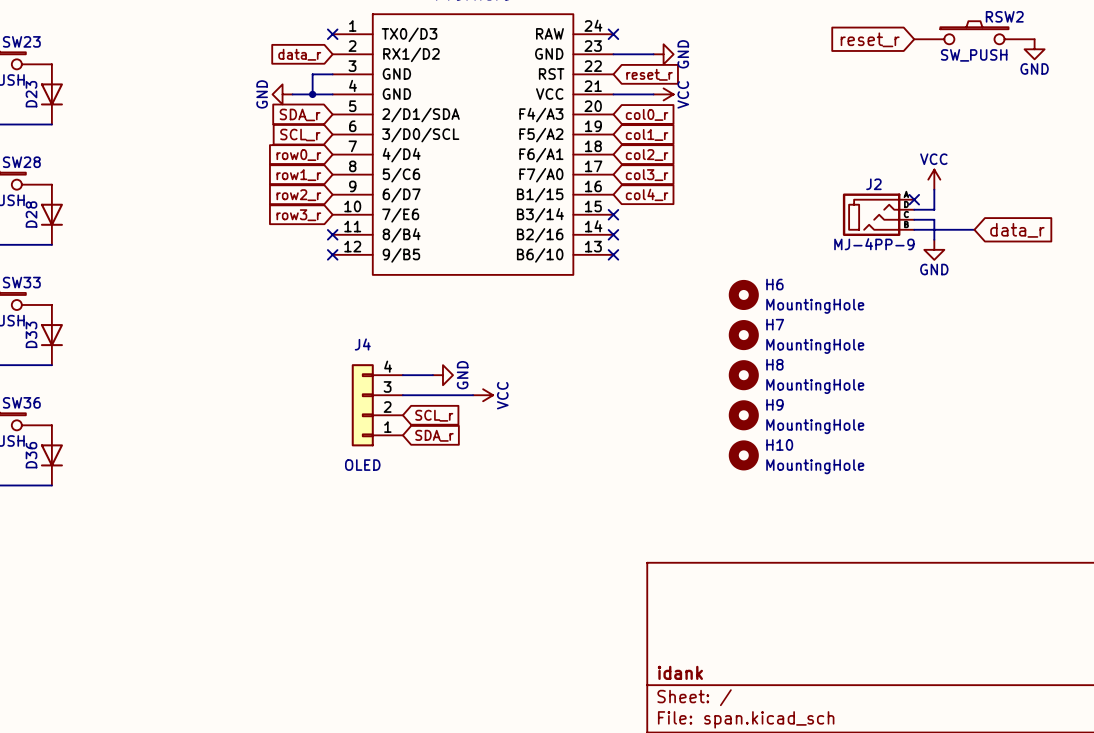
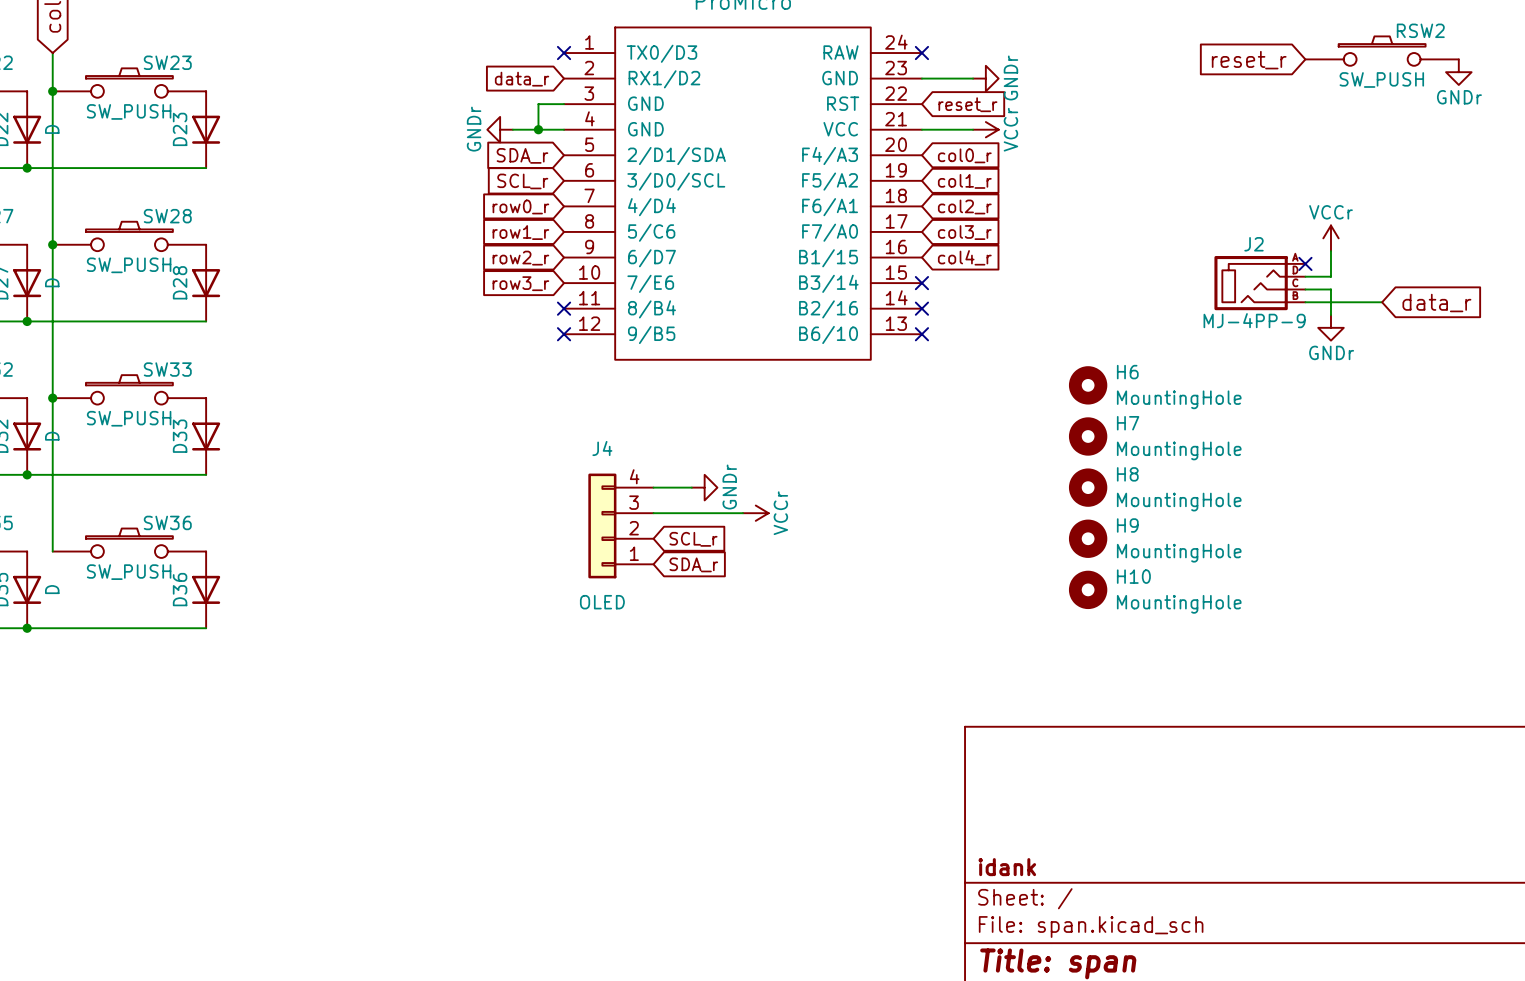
power symbol: GND (1034, 49) -> GNDr (1458, 72)
power symbol: GND (663, 54) -> GNDr (985, 78)
power symbol: GND (282, 94) -> GNDr (500, 129)
power symbol: VCC (663, 94) -> VCCr (985, 129)
power symbol: VCC (934, 179) -> VCCr (1330, 238)
power symbol: GND (934, 249) -> GNDr (1330, 327)
power symbol: GND (442, 375) -> GNDr (704, 487)
power symbol: VCC (483, 395) -> VCCr (755, 513)

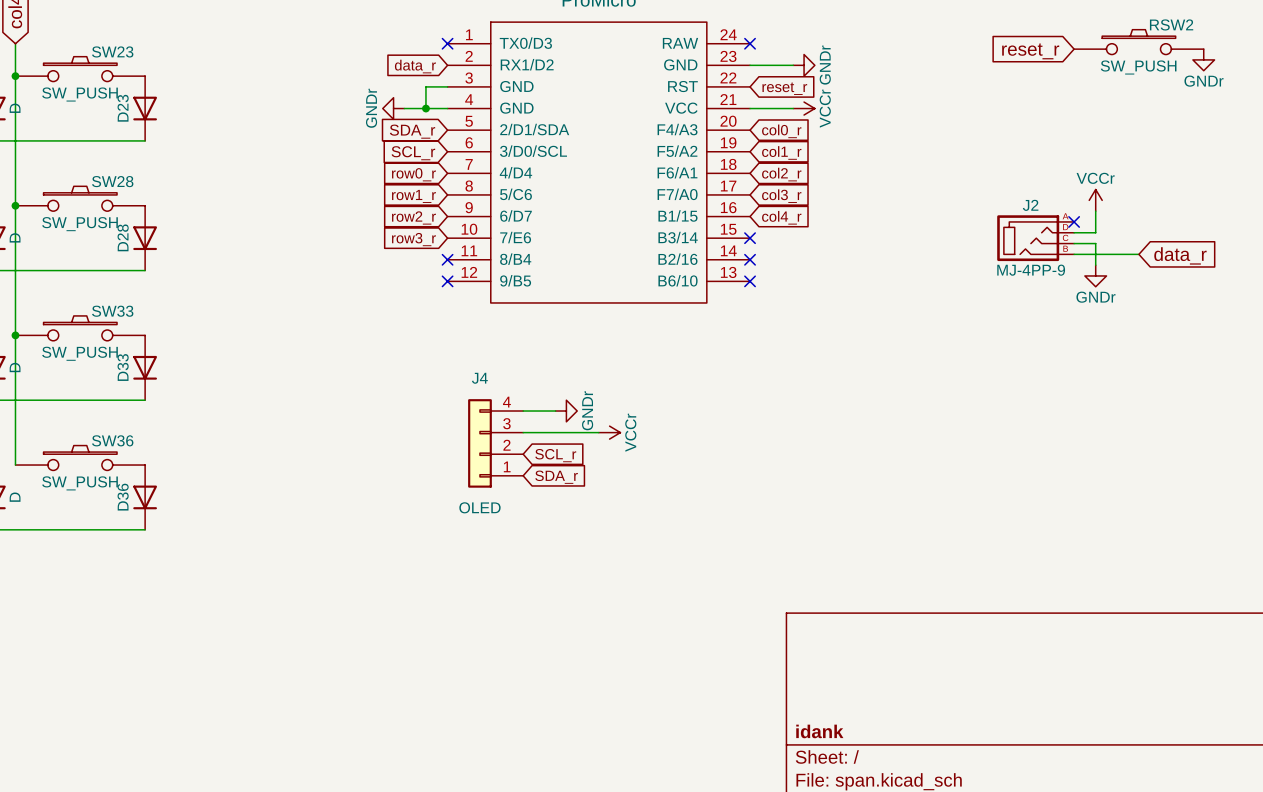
H6: MountingHole (1088, 385) -> none
H7: MountingHole (1088, 436) -> none
H8: MountingHole (1088, 487) -> none
H9: MountingHole (1088, 538) -> none
H10: MountingHole (1088, 589) -> none

